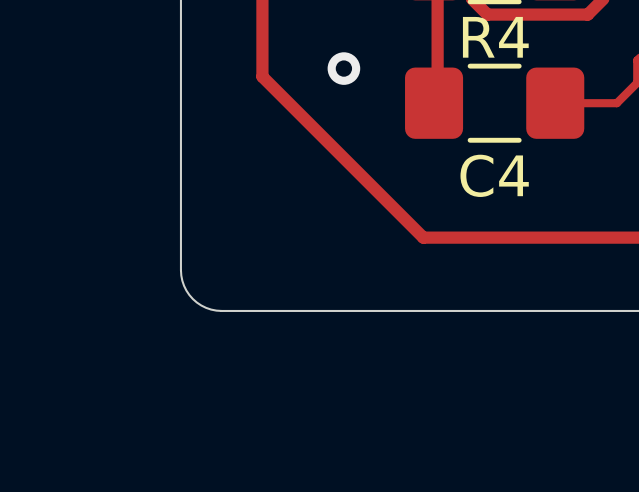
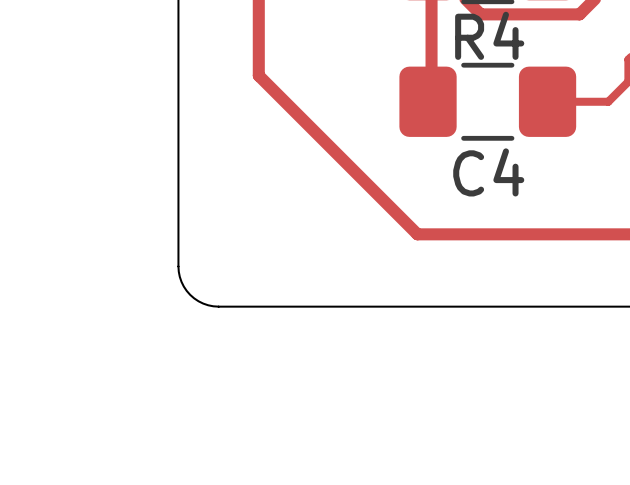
via: (343, 68) -> none

